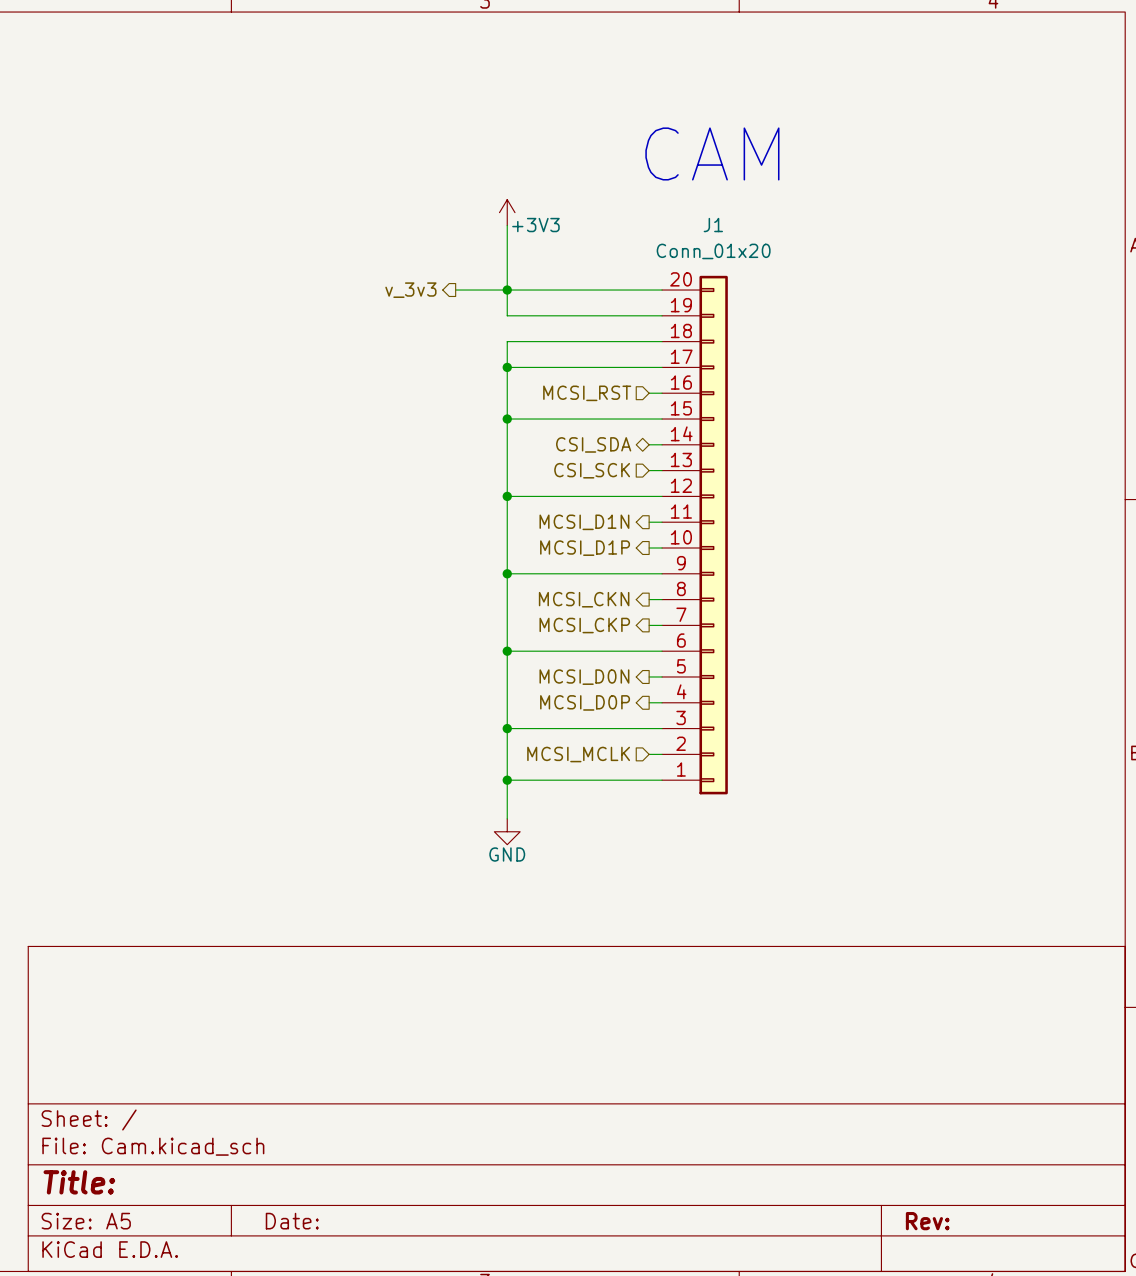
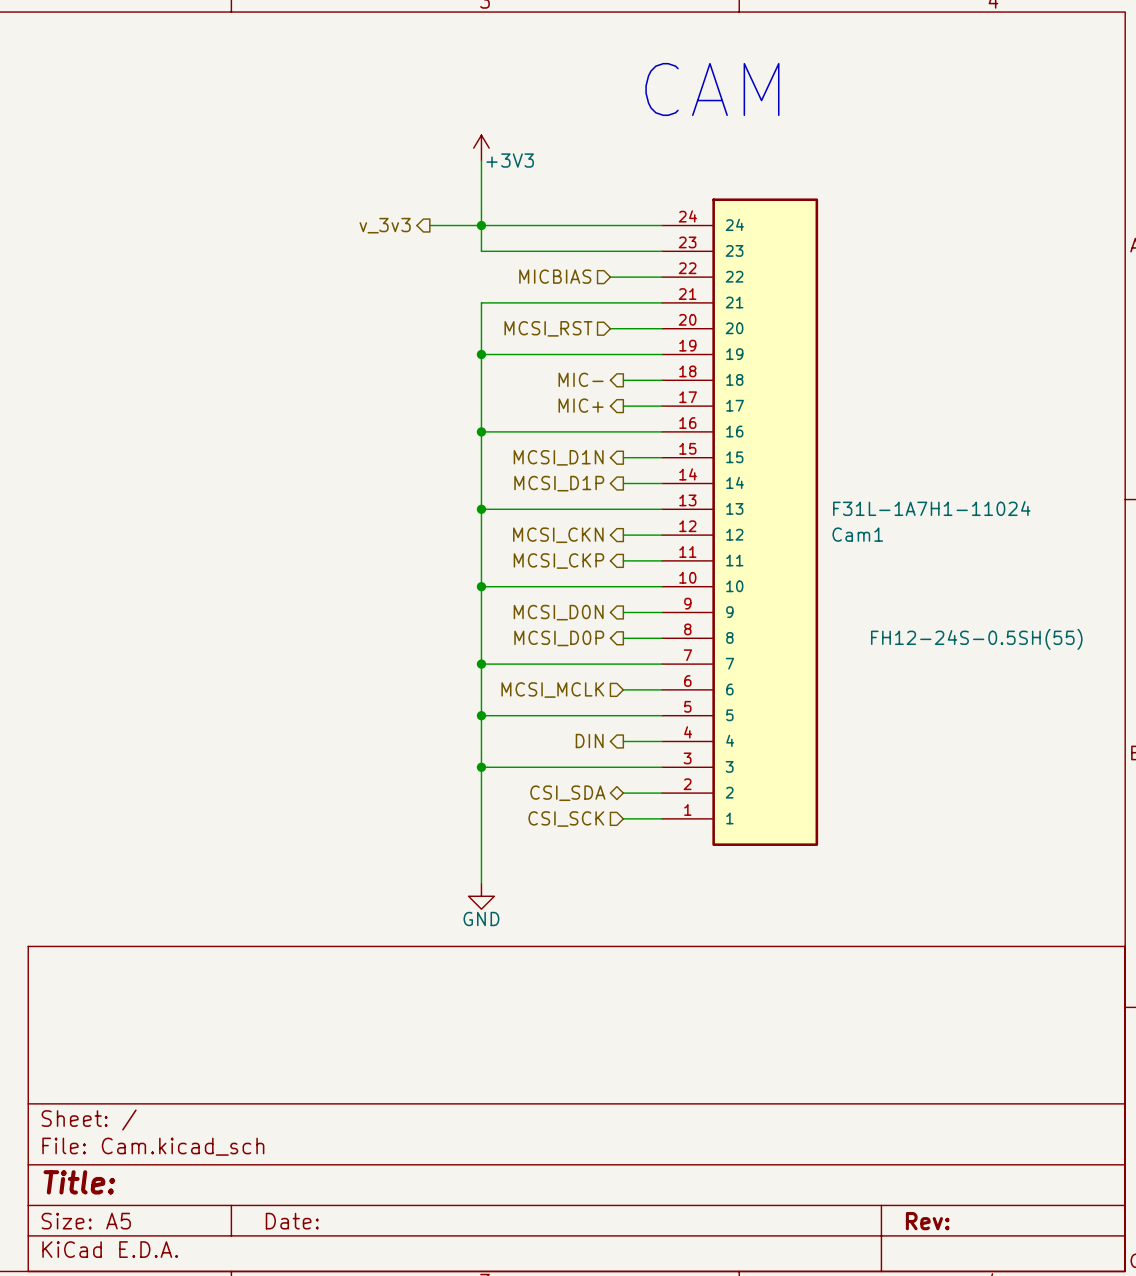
text position: CAM (712, 153) -> CAM (712, 89)
wire: none -> (481, 161) (481, 251) (662, 251)
power symbol position: +3V3 (507, 212) -> +3V3 (481, 148)
wire: none -> (429, 225) (662, 225)
junction: none -> (481, 225)
wire: (507, 225) (507, 315) (662, 315) -> none
hierarchical label: none -> MICBIAS (555, 276)
wire: none -> (610, 277) (662, 277)
hierarchical label position: v_3v3 (410, 290) -> v_3v3 (385, 225)
wire: (455, 290) (662, 290) -> none
junction: (507, 290) -> none
wire: none -> (662, 302) (481, 302) (481, 883)
wire: none -> (610, 328) (662, 328)
wire: (662, 341) (507, 341) (507, 818) -> none
wire: none -> (481, 354) (662, 354)
wire: (507, 367) (662, 367) -> none
junction position: (507, 367) -> (481, 354)
hierarchical label: none -> MIC- (581, 379)
wire: none -> (623, 380) (662, 380)
hierarchical label position: MCSI_RST (587, 393) -> MCSI_RST (548, 328)
wire: (649, 393) (662, 393) -> none
hierarchical label: none -> MIC+ (581, 405)
wire: none -> (623, 406) (662, 406)
wire: (507, 419) (662, 419) -> none
junction position: (507, 419) -> (481, 431)
wire: none -> (481, 431) (662, 431)
hierarchical label: CSI_SDA (593, 444) -> none
wire: (649, 444) (662, 444) -> none
wire: none -> (623, 457) (662, 457)
hierarchical label: CSI_SCK (592, 470) -> none
wire: (649, 470) (662, 470) -> none
wire: none -> (623, 483) (662, 483)
wire: (507, 496) (662, 496) -> none
junction position: (507, 496) -> (481, 509)
wire: none -> (481, 509) (662, 509)
hierarchical label position: MCSI_D1N (584, 522) -> MCSI_D1N (558, 457)
wire: (649, 522) (662, 522) -> none
Cam1: none -> F31L-1A7H1-11024 (740, 522)
wire: none -> (623, 535) (662, 535)
J1: Conn_01x20 (694, 535) -> none
hierarchical label position: MCSI_D1P (585, 548) -> MCSI_D1P (559, 483)
wire: (649, 548) (662, 548) -> none
wire: none -> (623, 560) (662, 560)
wire: (507, 573) (662, 573) -> none
junction position: (507, 573) -> (481, 586)
wire: none -> (481, 586) (662, 586)
hierarchical label position: MCSI_CKN (584, 599) -> MCSI_CKN (558, 535)
wire: (649, 599) (662, 599) -> none
wire: none -> (623, 612) (662, 612)
hierarchical label position: MCSI_CKP (584, 625) -> MCSI_CKP (558, 561)
wire: (649, 625) (662, 625) -> none
wire: none -> (623, 638) (662, 638)
wire: (507, 651) (662, 651) -> none
junction position: (507, 651) -> (481, 664)
wire: none -> (481, 664) (662, 664)
wire: (649, 676) (662, 676) -> none
hierarchical label position: MCSI_D0N (584, 677) -> MCSI_D0N (558, 612)
wire: none -> (623, 689) (662, 689)
hierarchical label position: MCSI_D0P (585, 702) -> MCSI_D0P (559, 638)
wire: (649, 702) (662, 702) -> none
wire: none -> (481, 715) (662, 715)
junction: none -> (481, 715)
wire: (507, 728) (662, 728) -> none
junction: (507, 728) -> none
hierarchical label: none -> DIN (589, 741)
wire: none -> (623, 741) (662, 741)
hierarchical label position: MCSI_MCLK (578, 754) -> MCSI_MCLK (552, 690)
wire: (649, 754) (662, 754) -> none
wire: none -> (481, 767) (662, 767)
junction: none -> (481, 767)
wire: (507, 780) (662, 780) -> none
junction: (507, 780) -> none
hierarchical label: none -> CSI_SDA (567, 793)
wire: none -> (623, 793) (662, 793)
wire: none -> (623, 818) (662, 818)
hierarchical label: none -> CSI_SCK (566, 819)
power symbol position: GND (507, 831) -> GND (481, 896)

